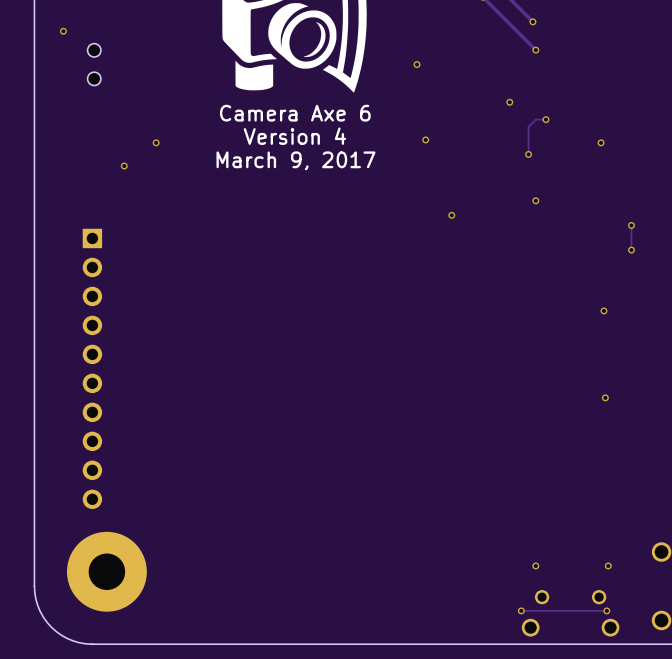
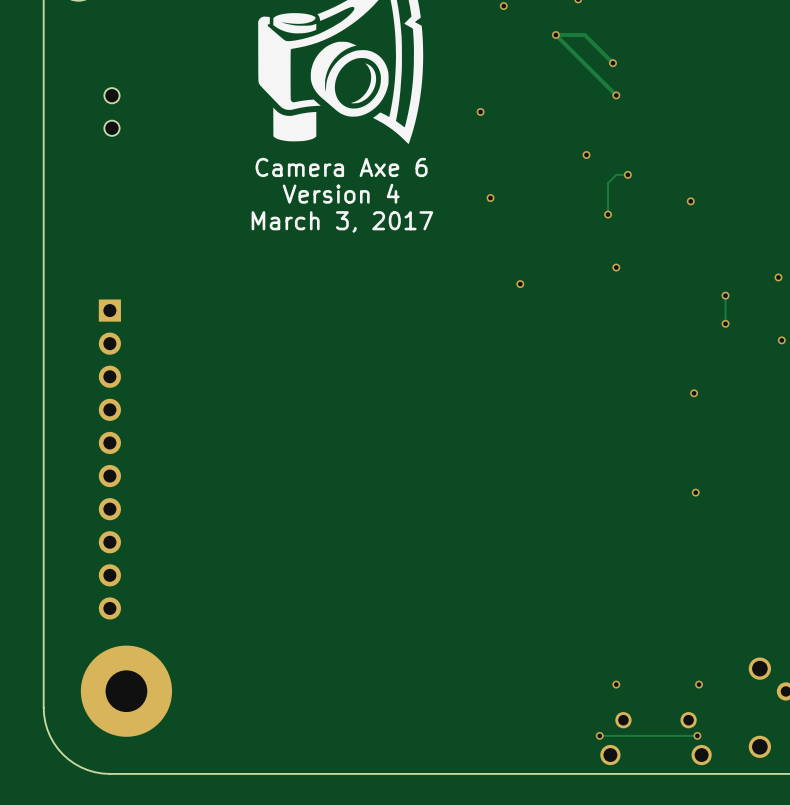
via: (63, 31) -> none
via: (156, 142) -> none
text: March 9, 2017 (295, 160) -> March 3, 2017 (342, 221)
via: (124, 166) -> none

